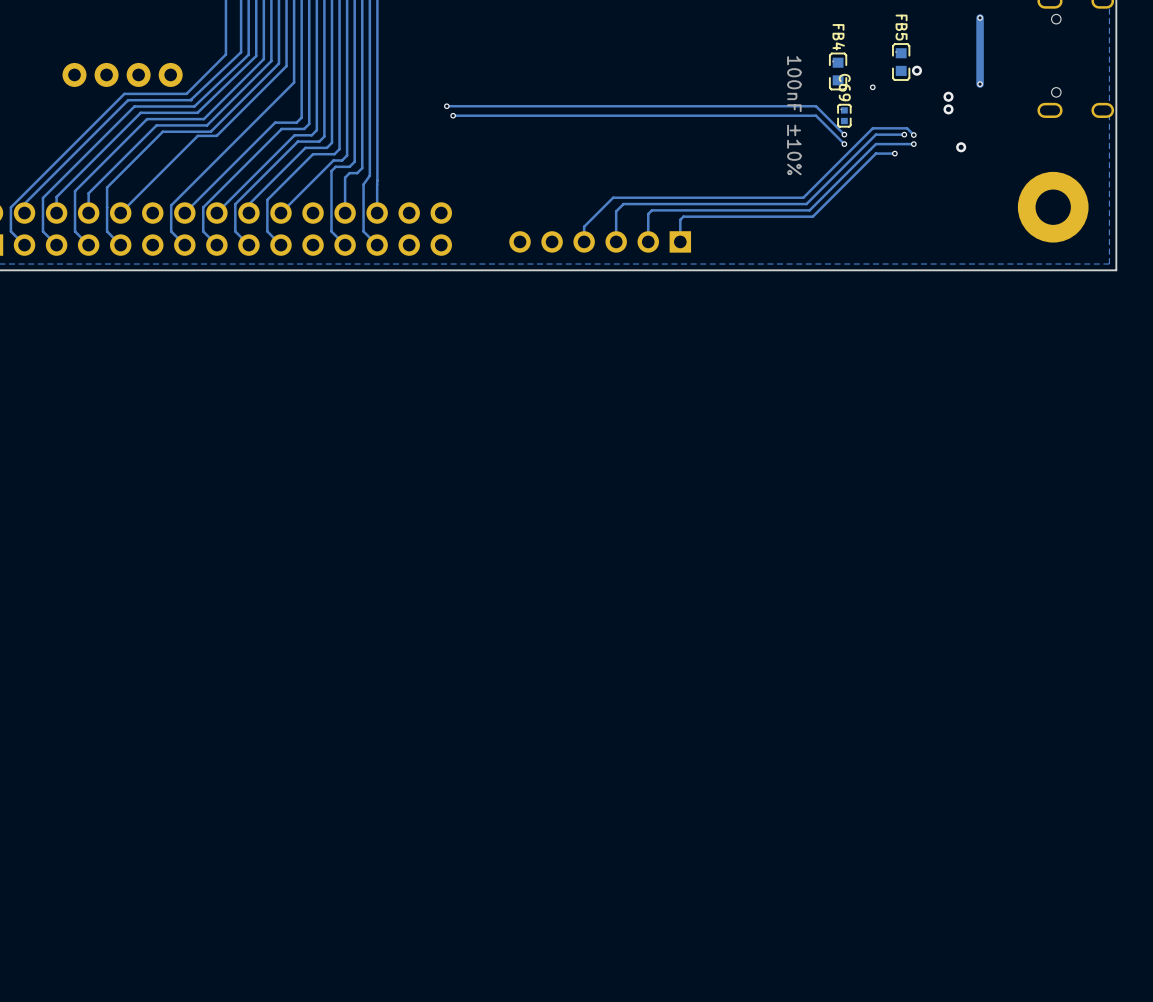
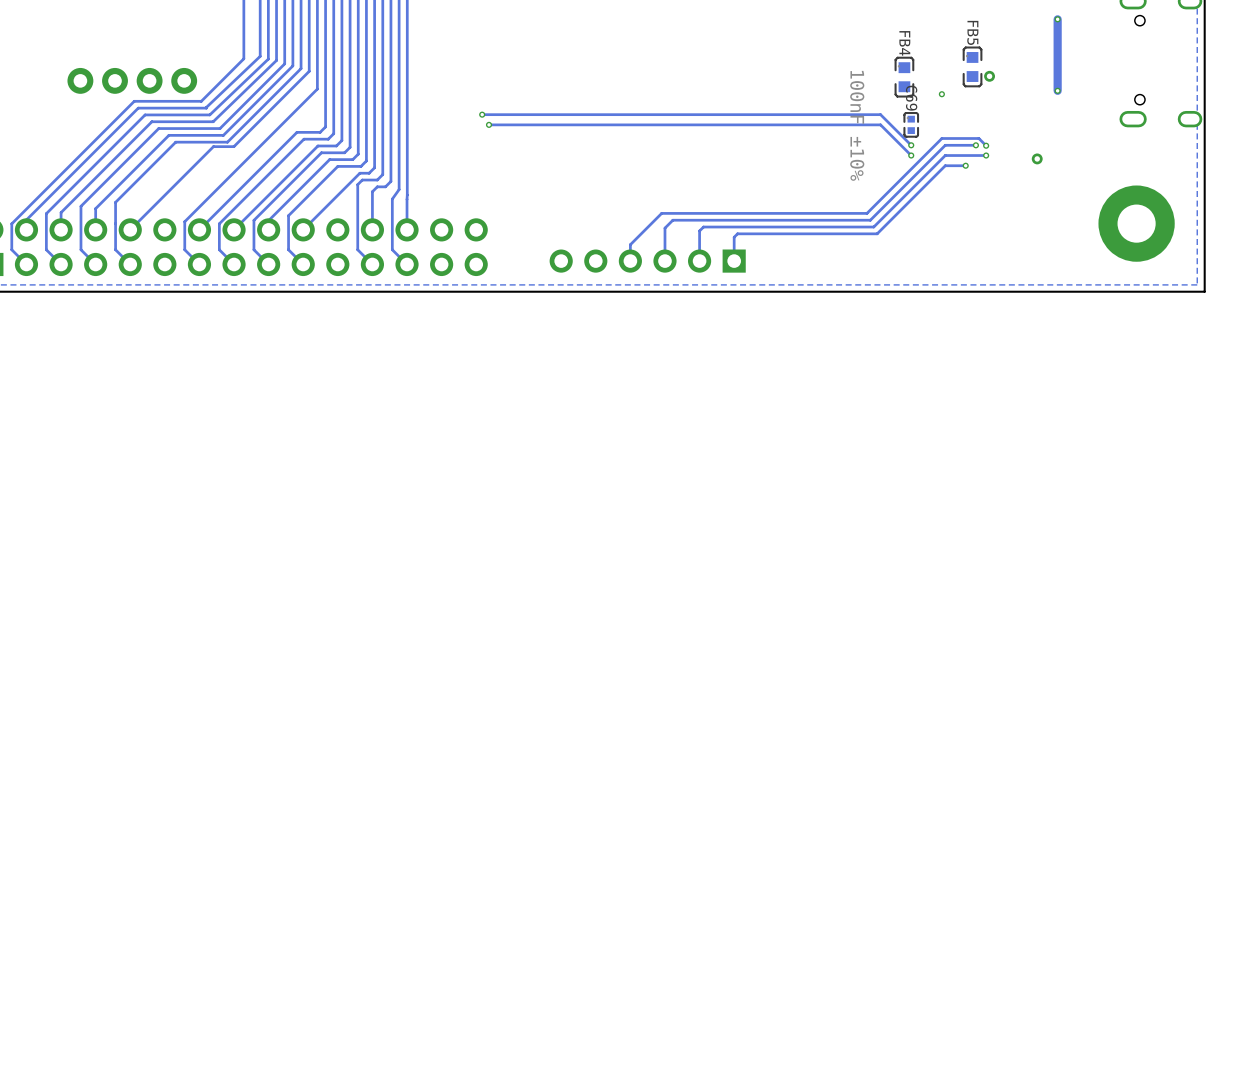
via: (948, 96) -> none
via: (948, 109) -> none

